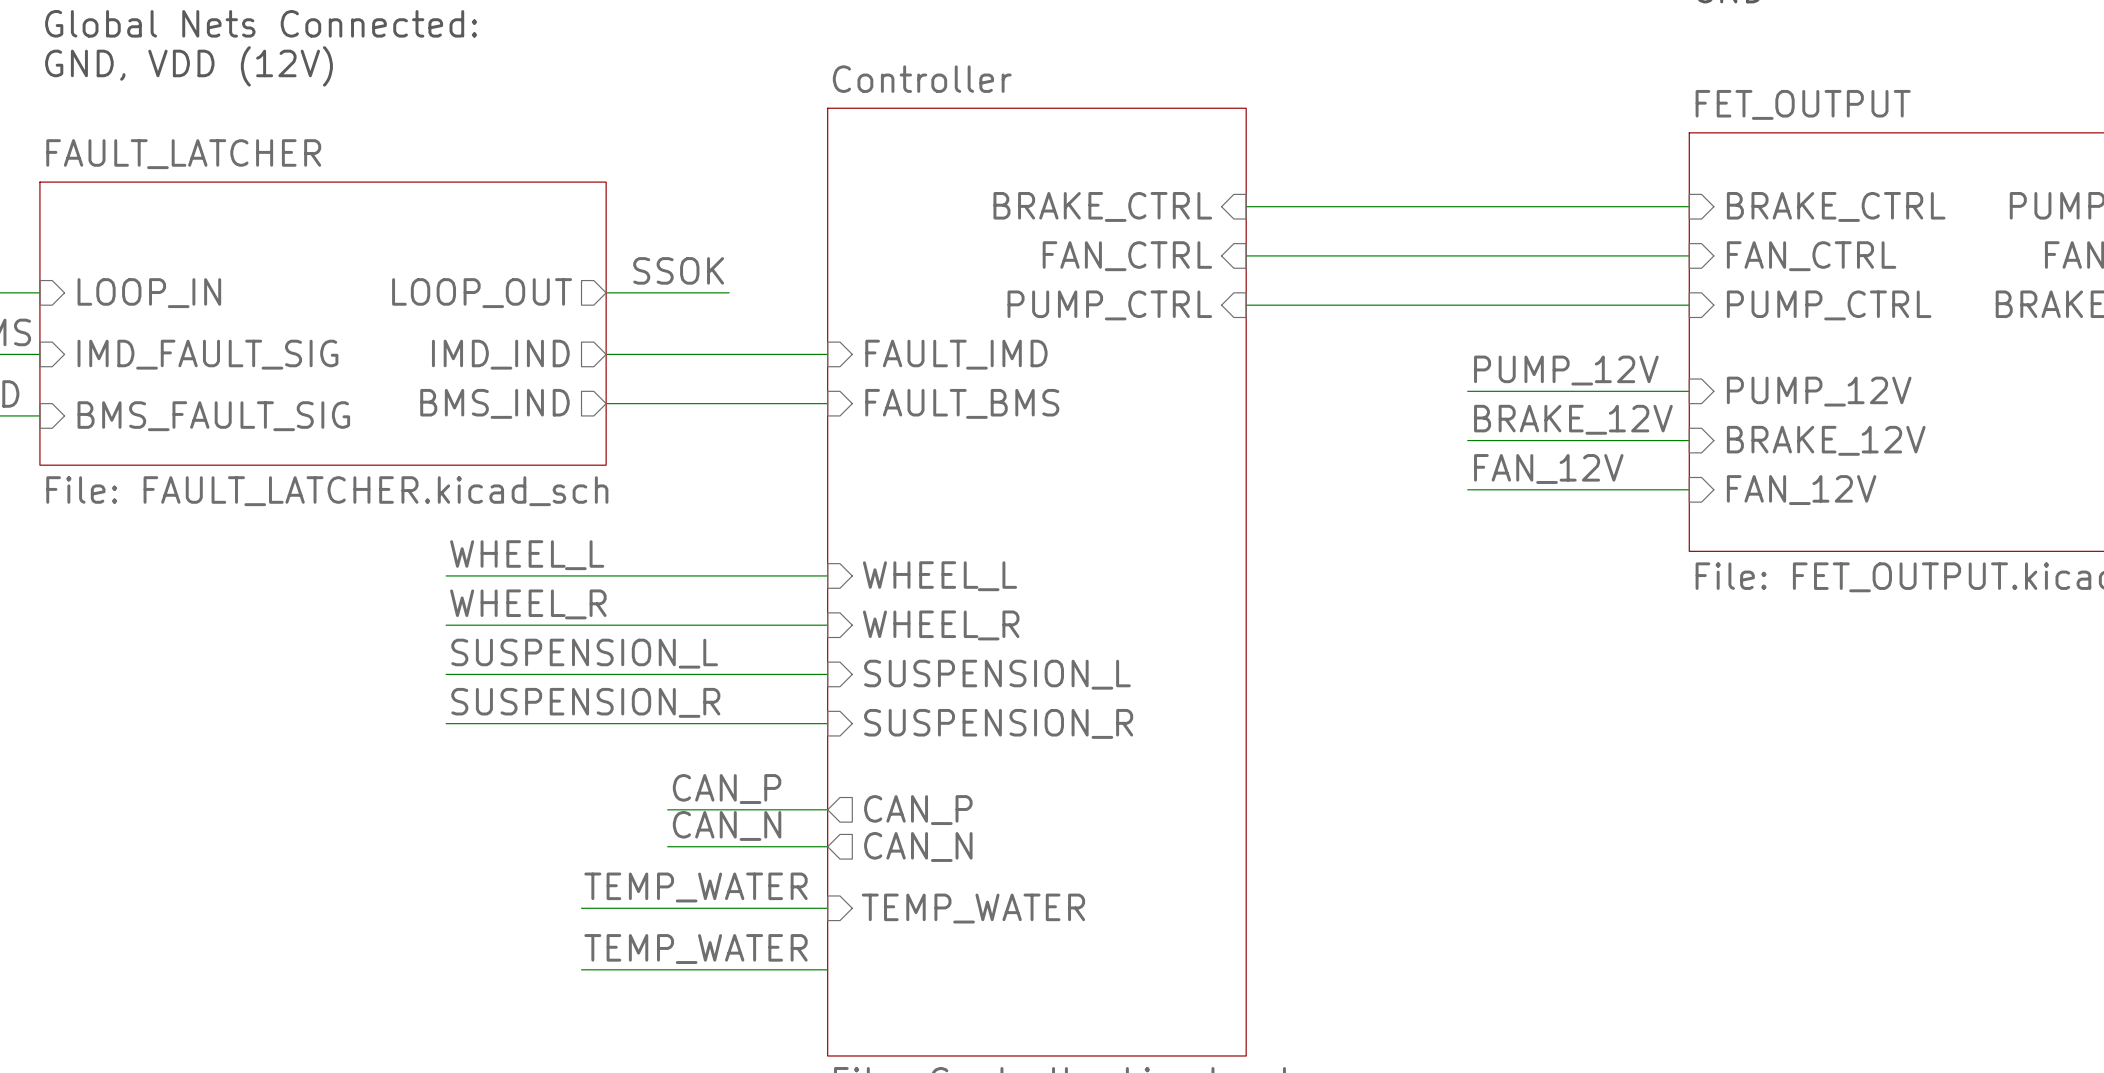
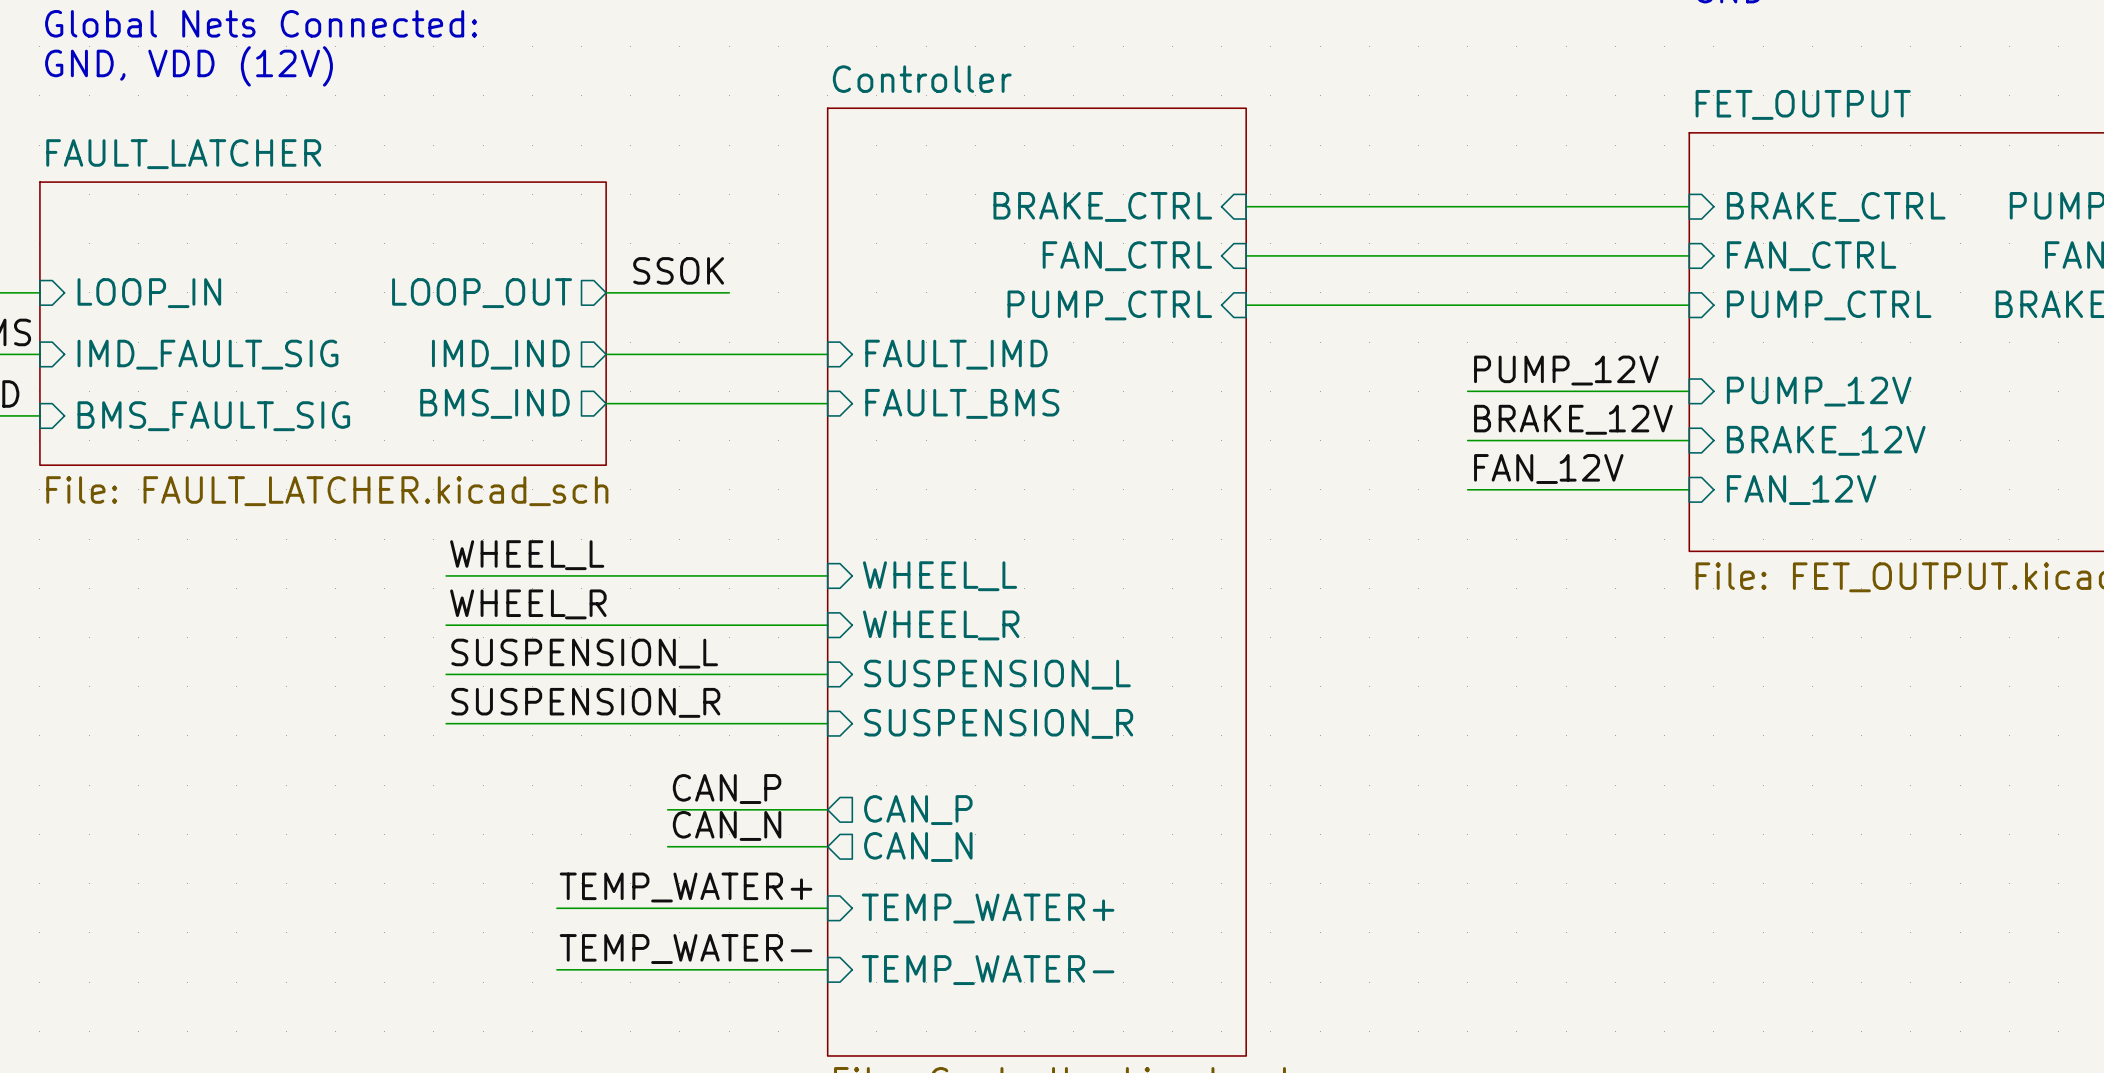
label: TEMP_WATER (695, 887) -> TEMP_WATER+ (686, 887)
wire: none -> (556, 908) (581, 908)
sheet pin: TEMP_WATER (973, 908) -> TEMP_WATER+ (988, 908)
label: TEMP_WATER (695, 949) -> TEMP_WATER- (686, 949)
wire: none -> (556, 969) (581, 969)
sheet pin: none -> TEMP_WATER- (988, 970)

